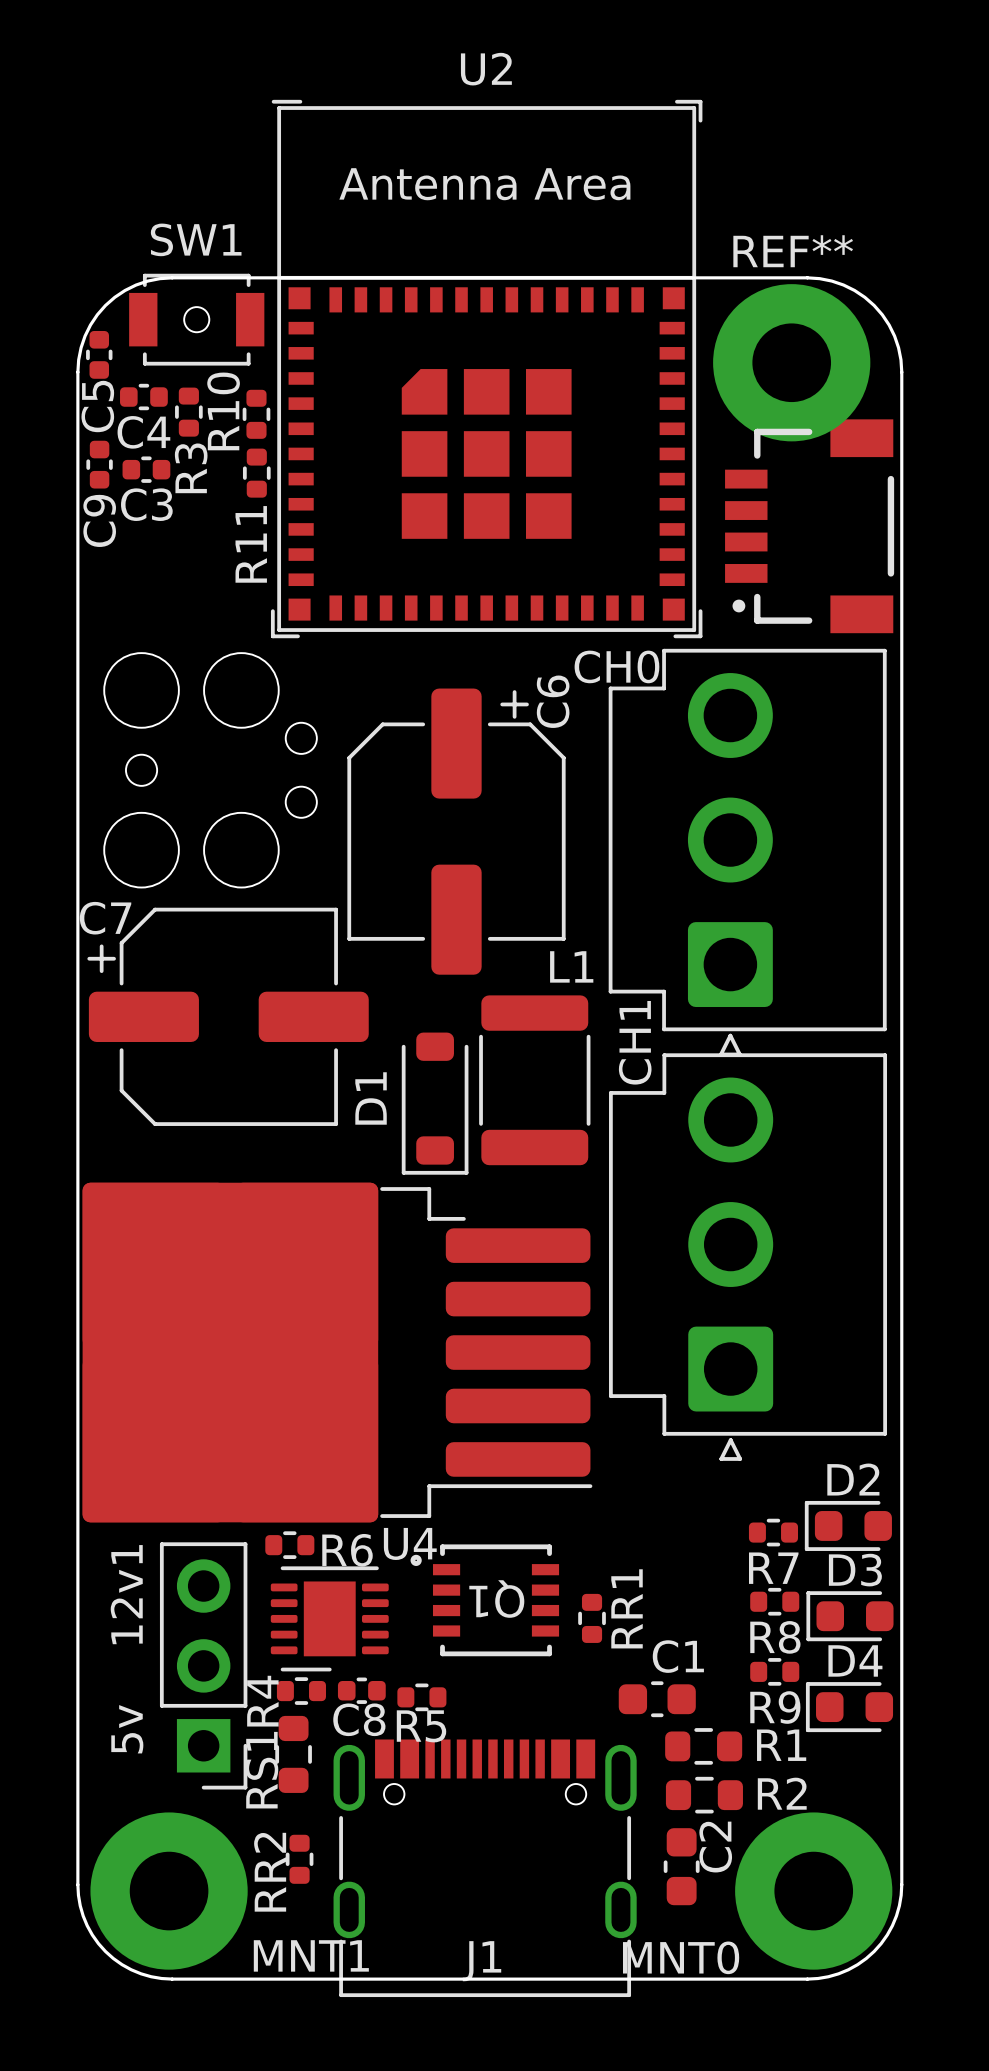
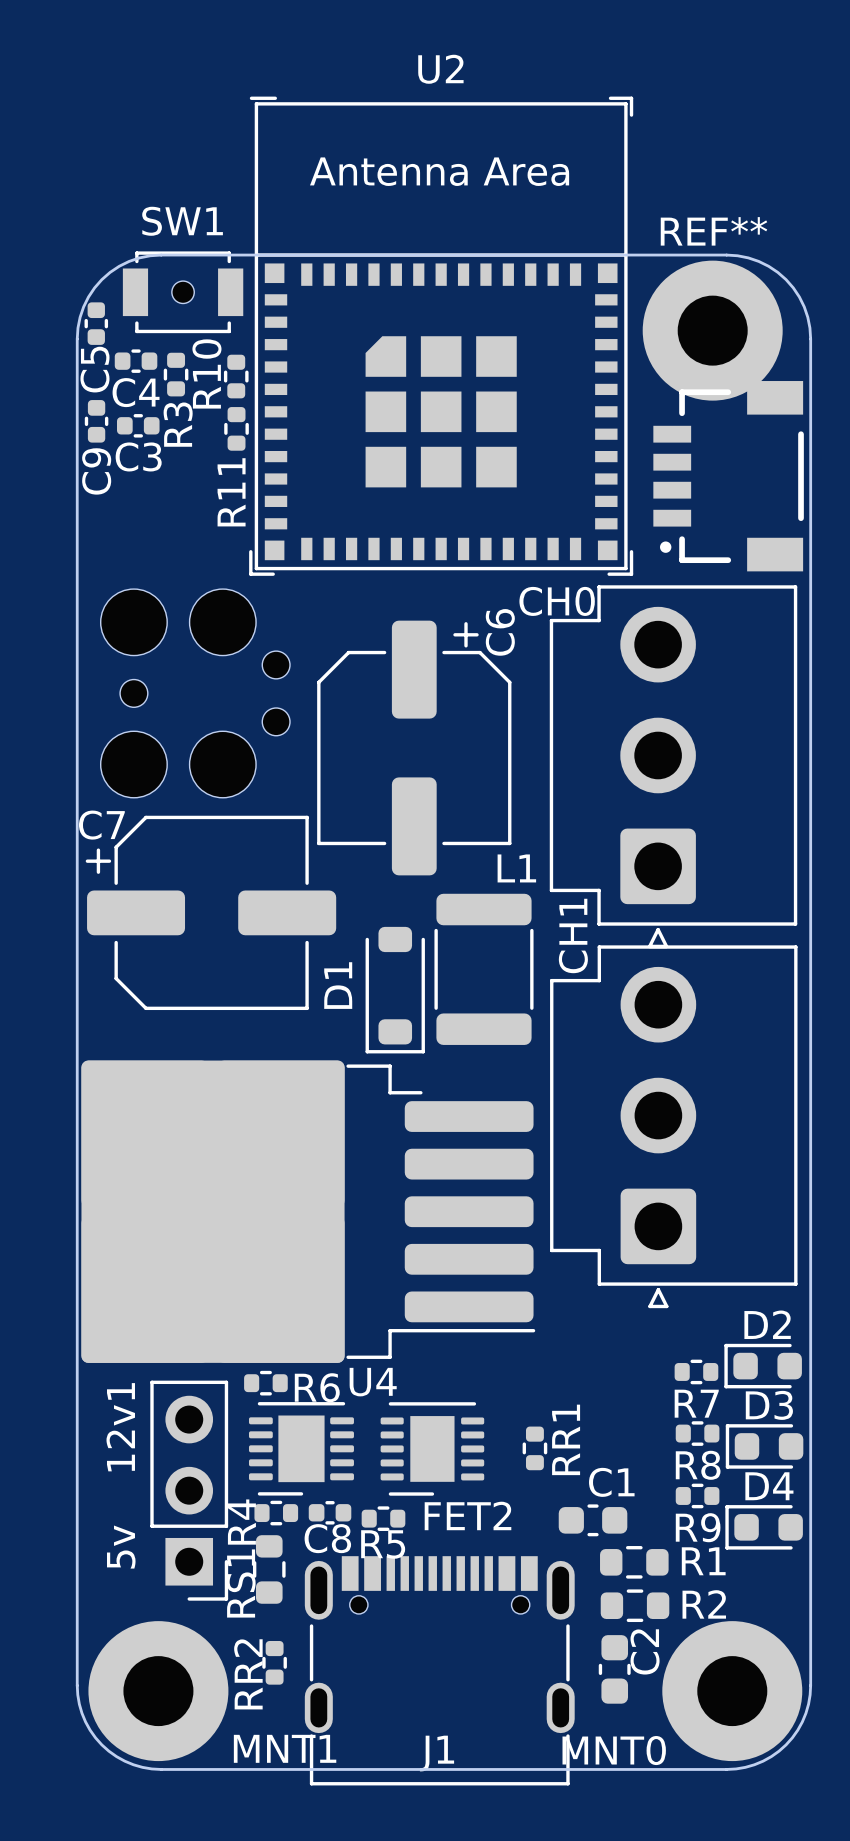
Q1: (484, 1600) -> none
FET2: none -> (432, 1448)

